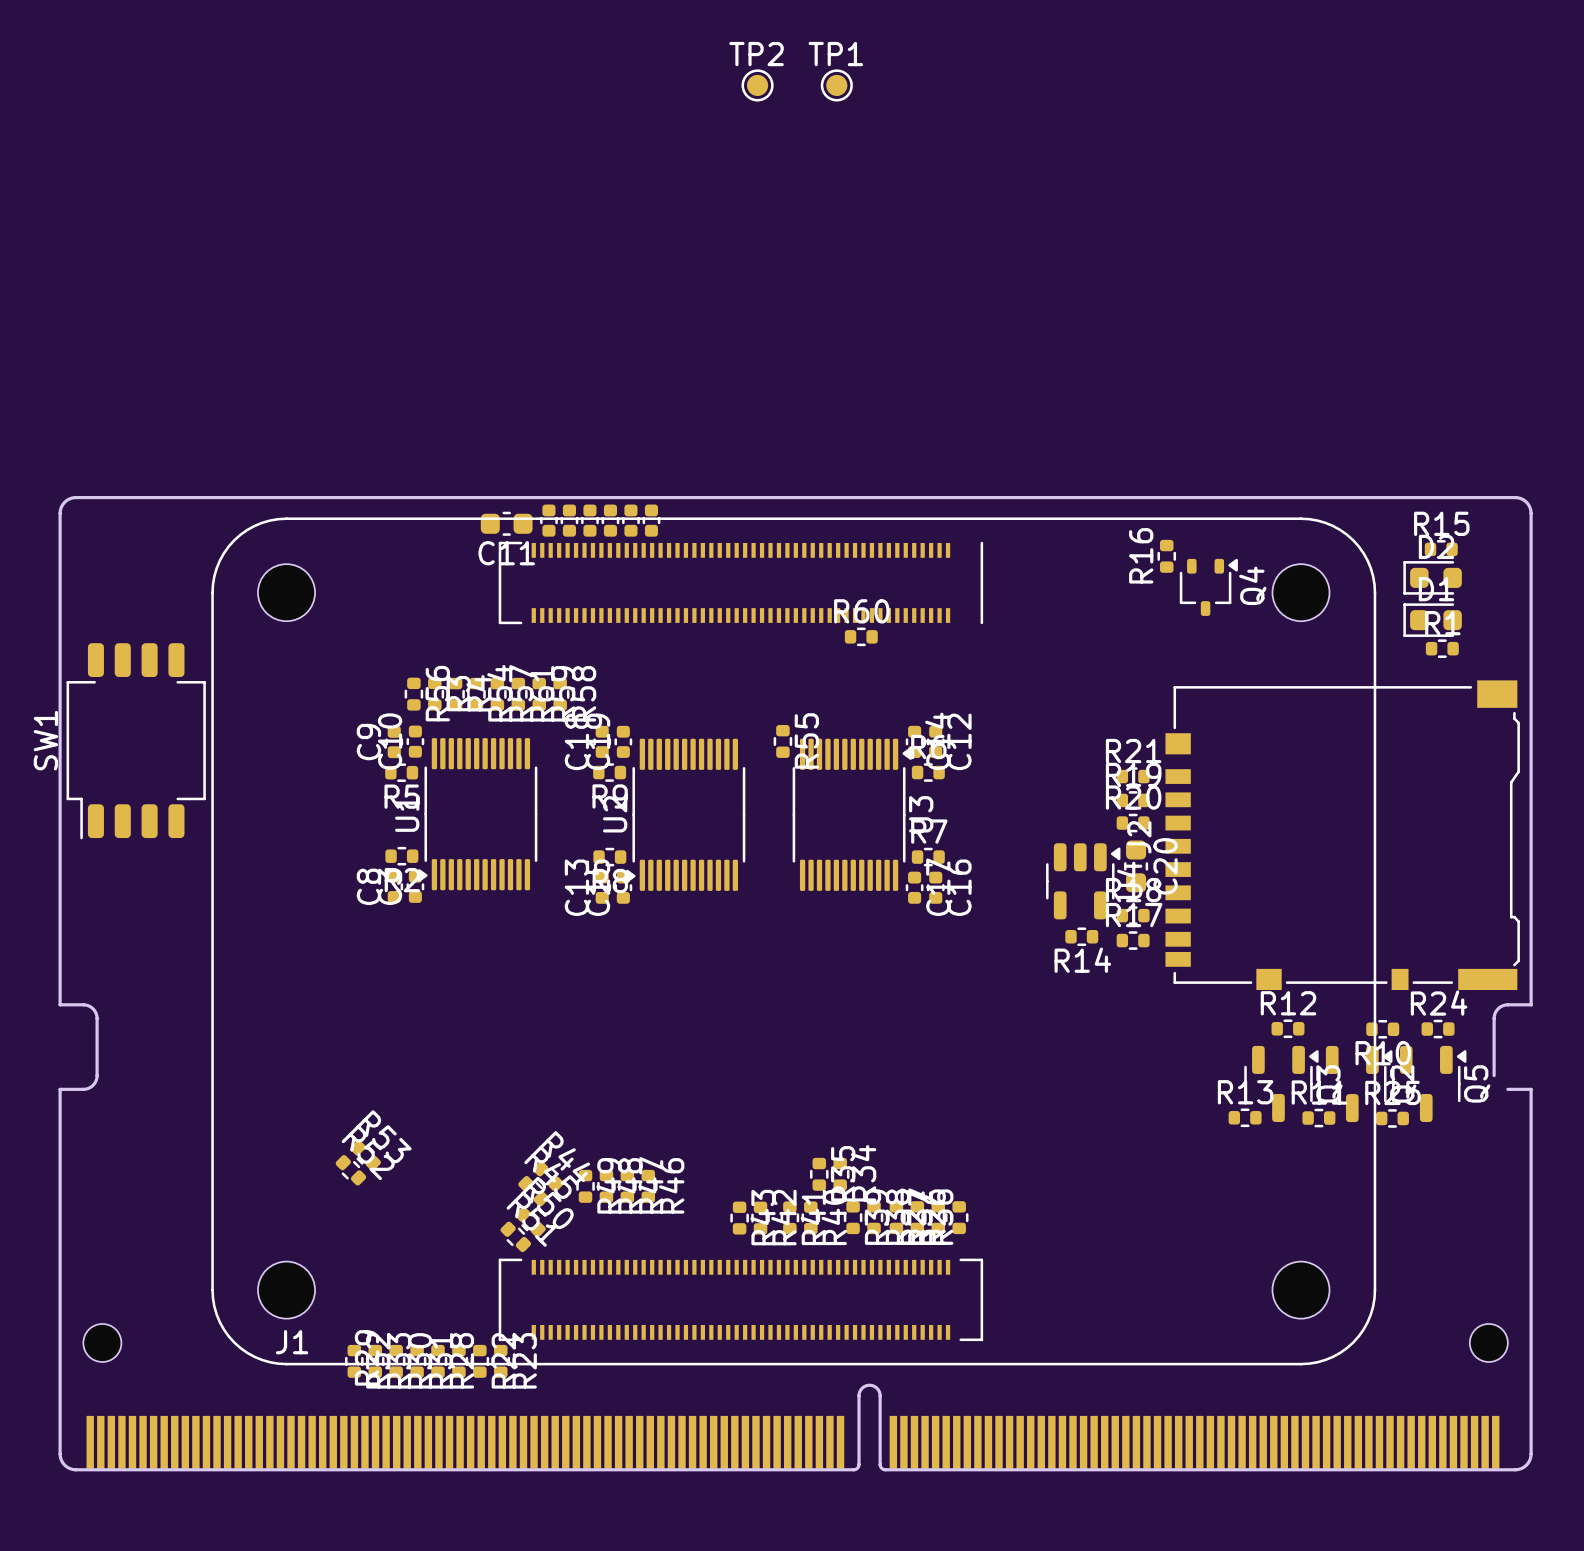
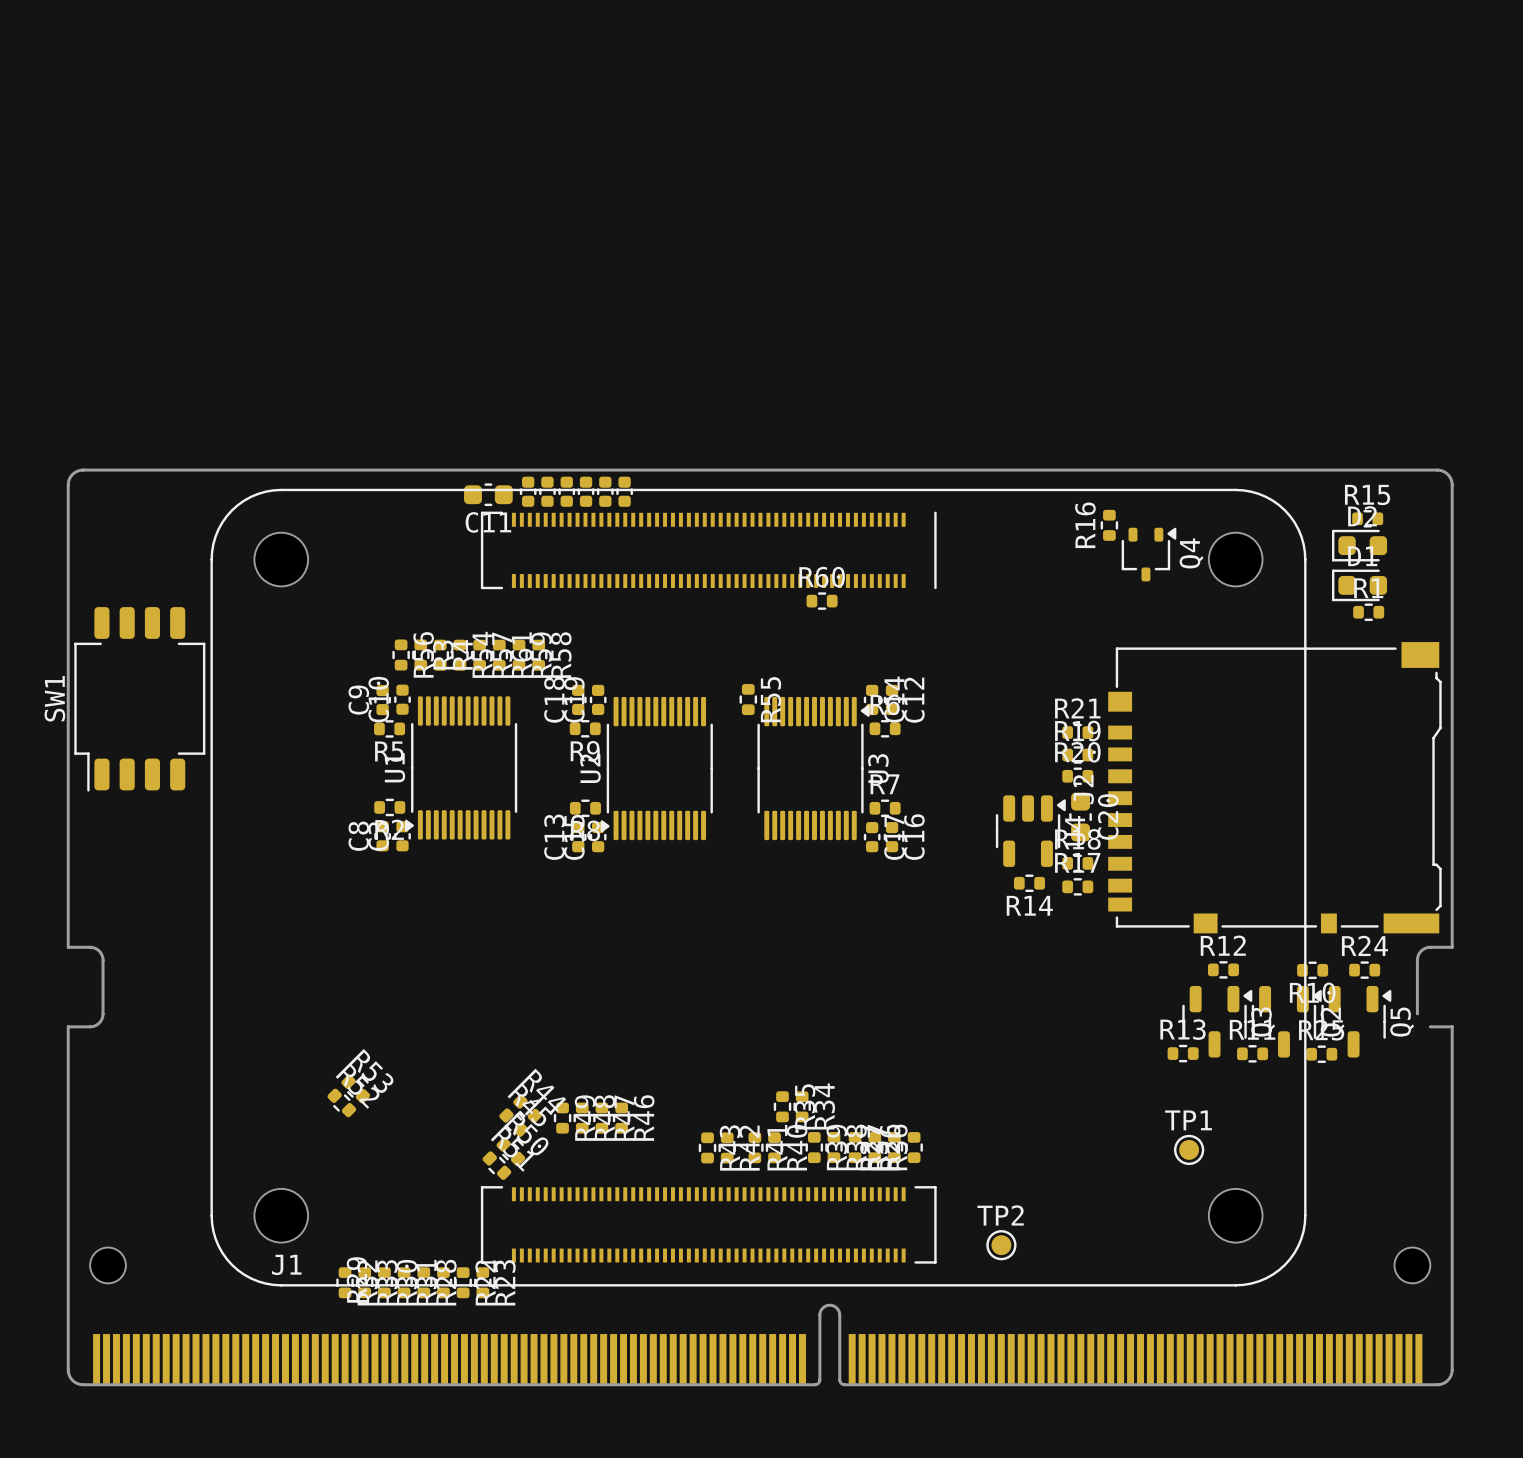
TP2 position: (757, 85) -> (1001, 1245)
TP1 position: (836, 85) -> (1189, 1149)

